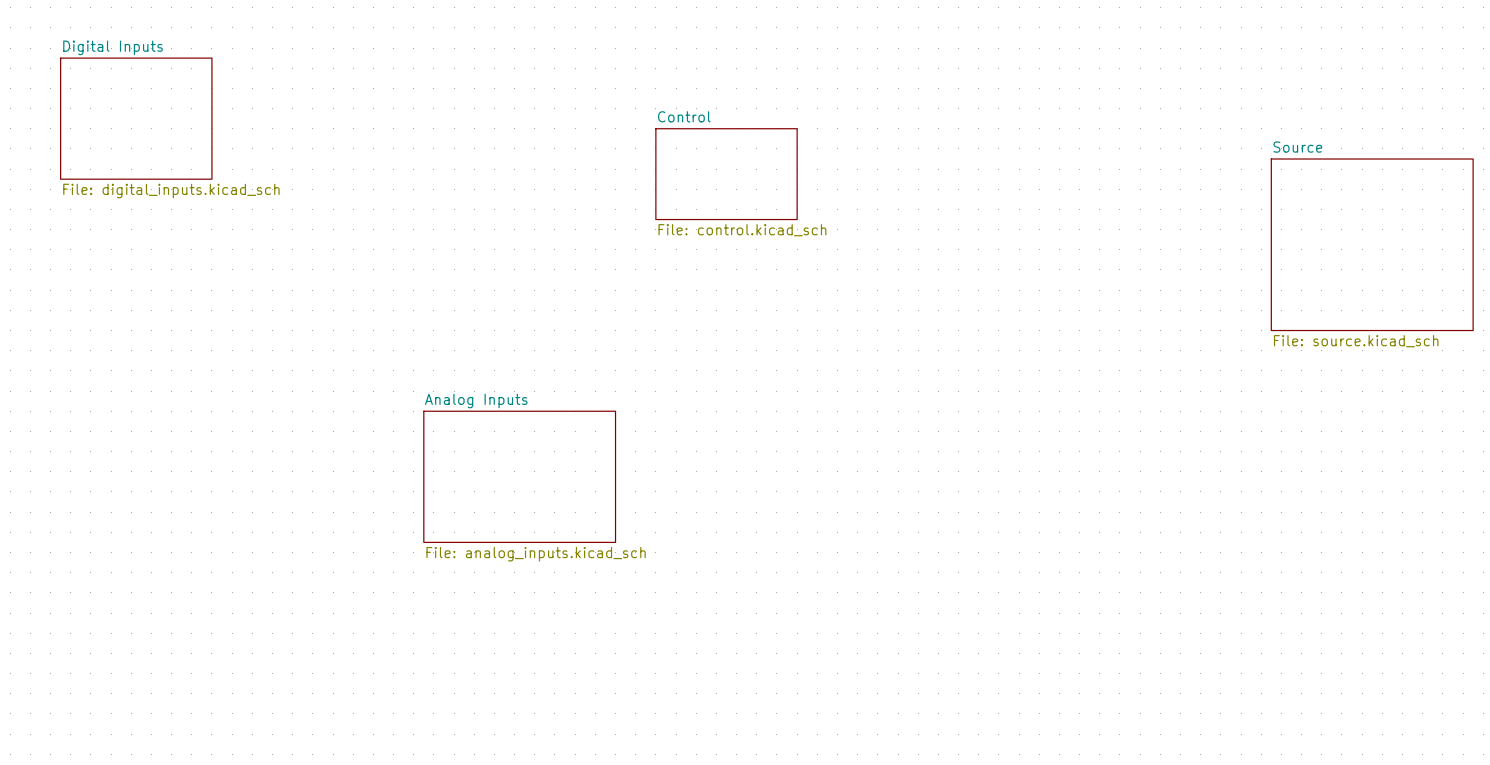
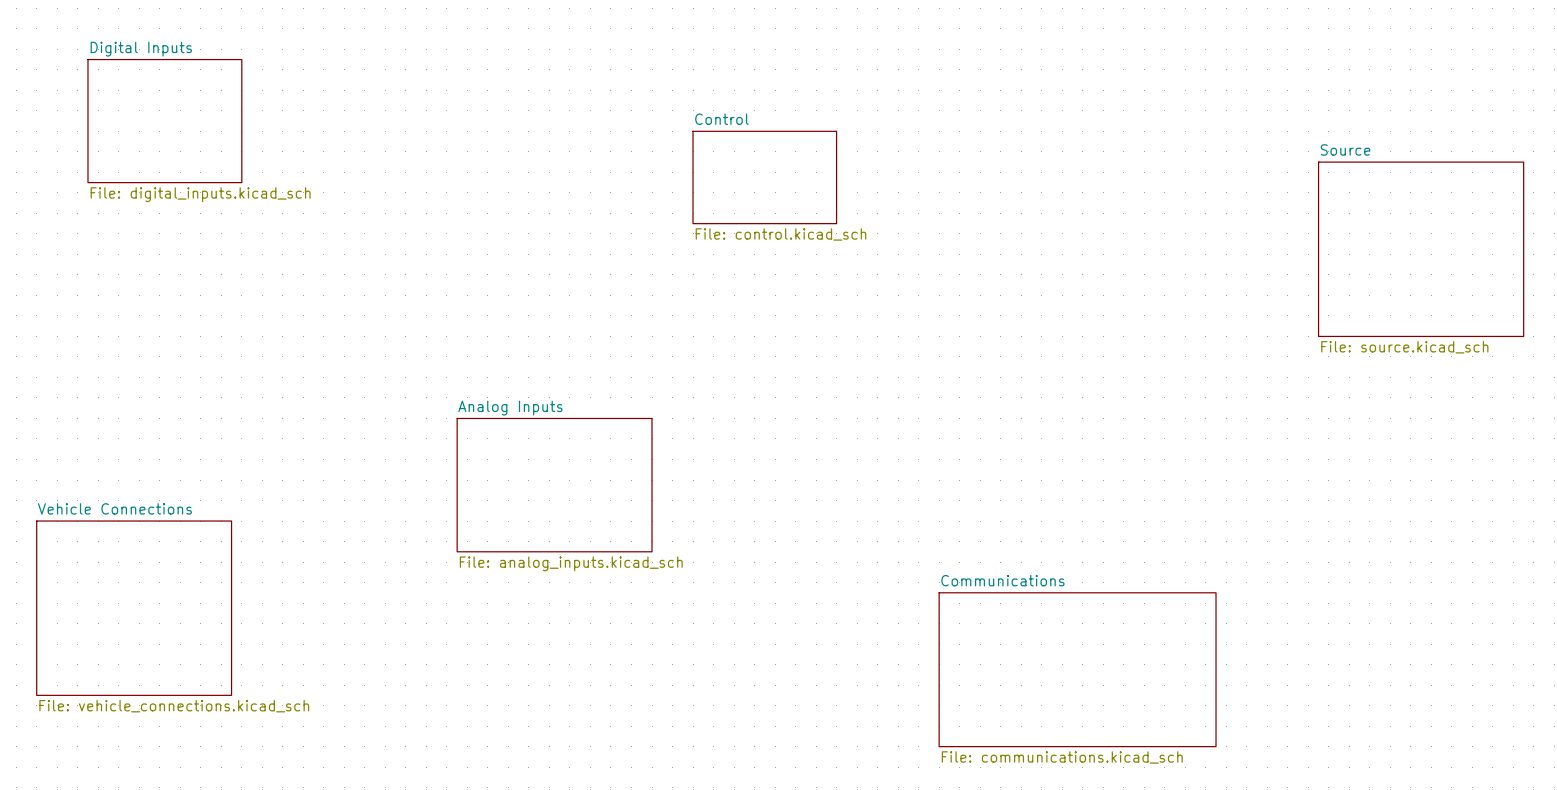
sheet Vehicle Connections: none -> File: vehicle_connections.kicad_sch (134, 608)
sheet Communications: none -> File: communications.kicad_sch (1077, 669)

